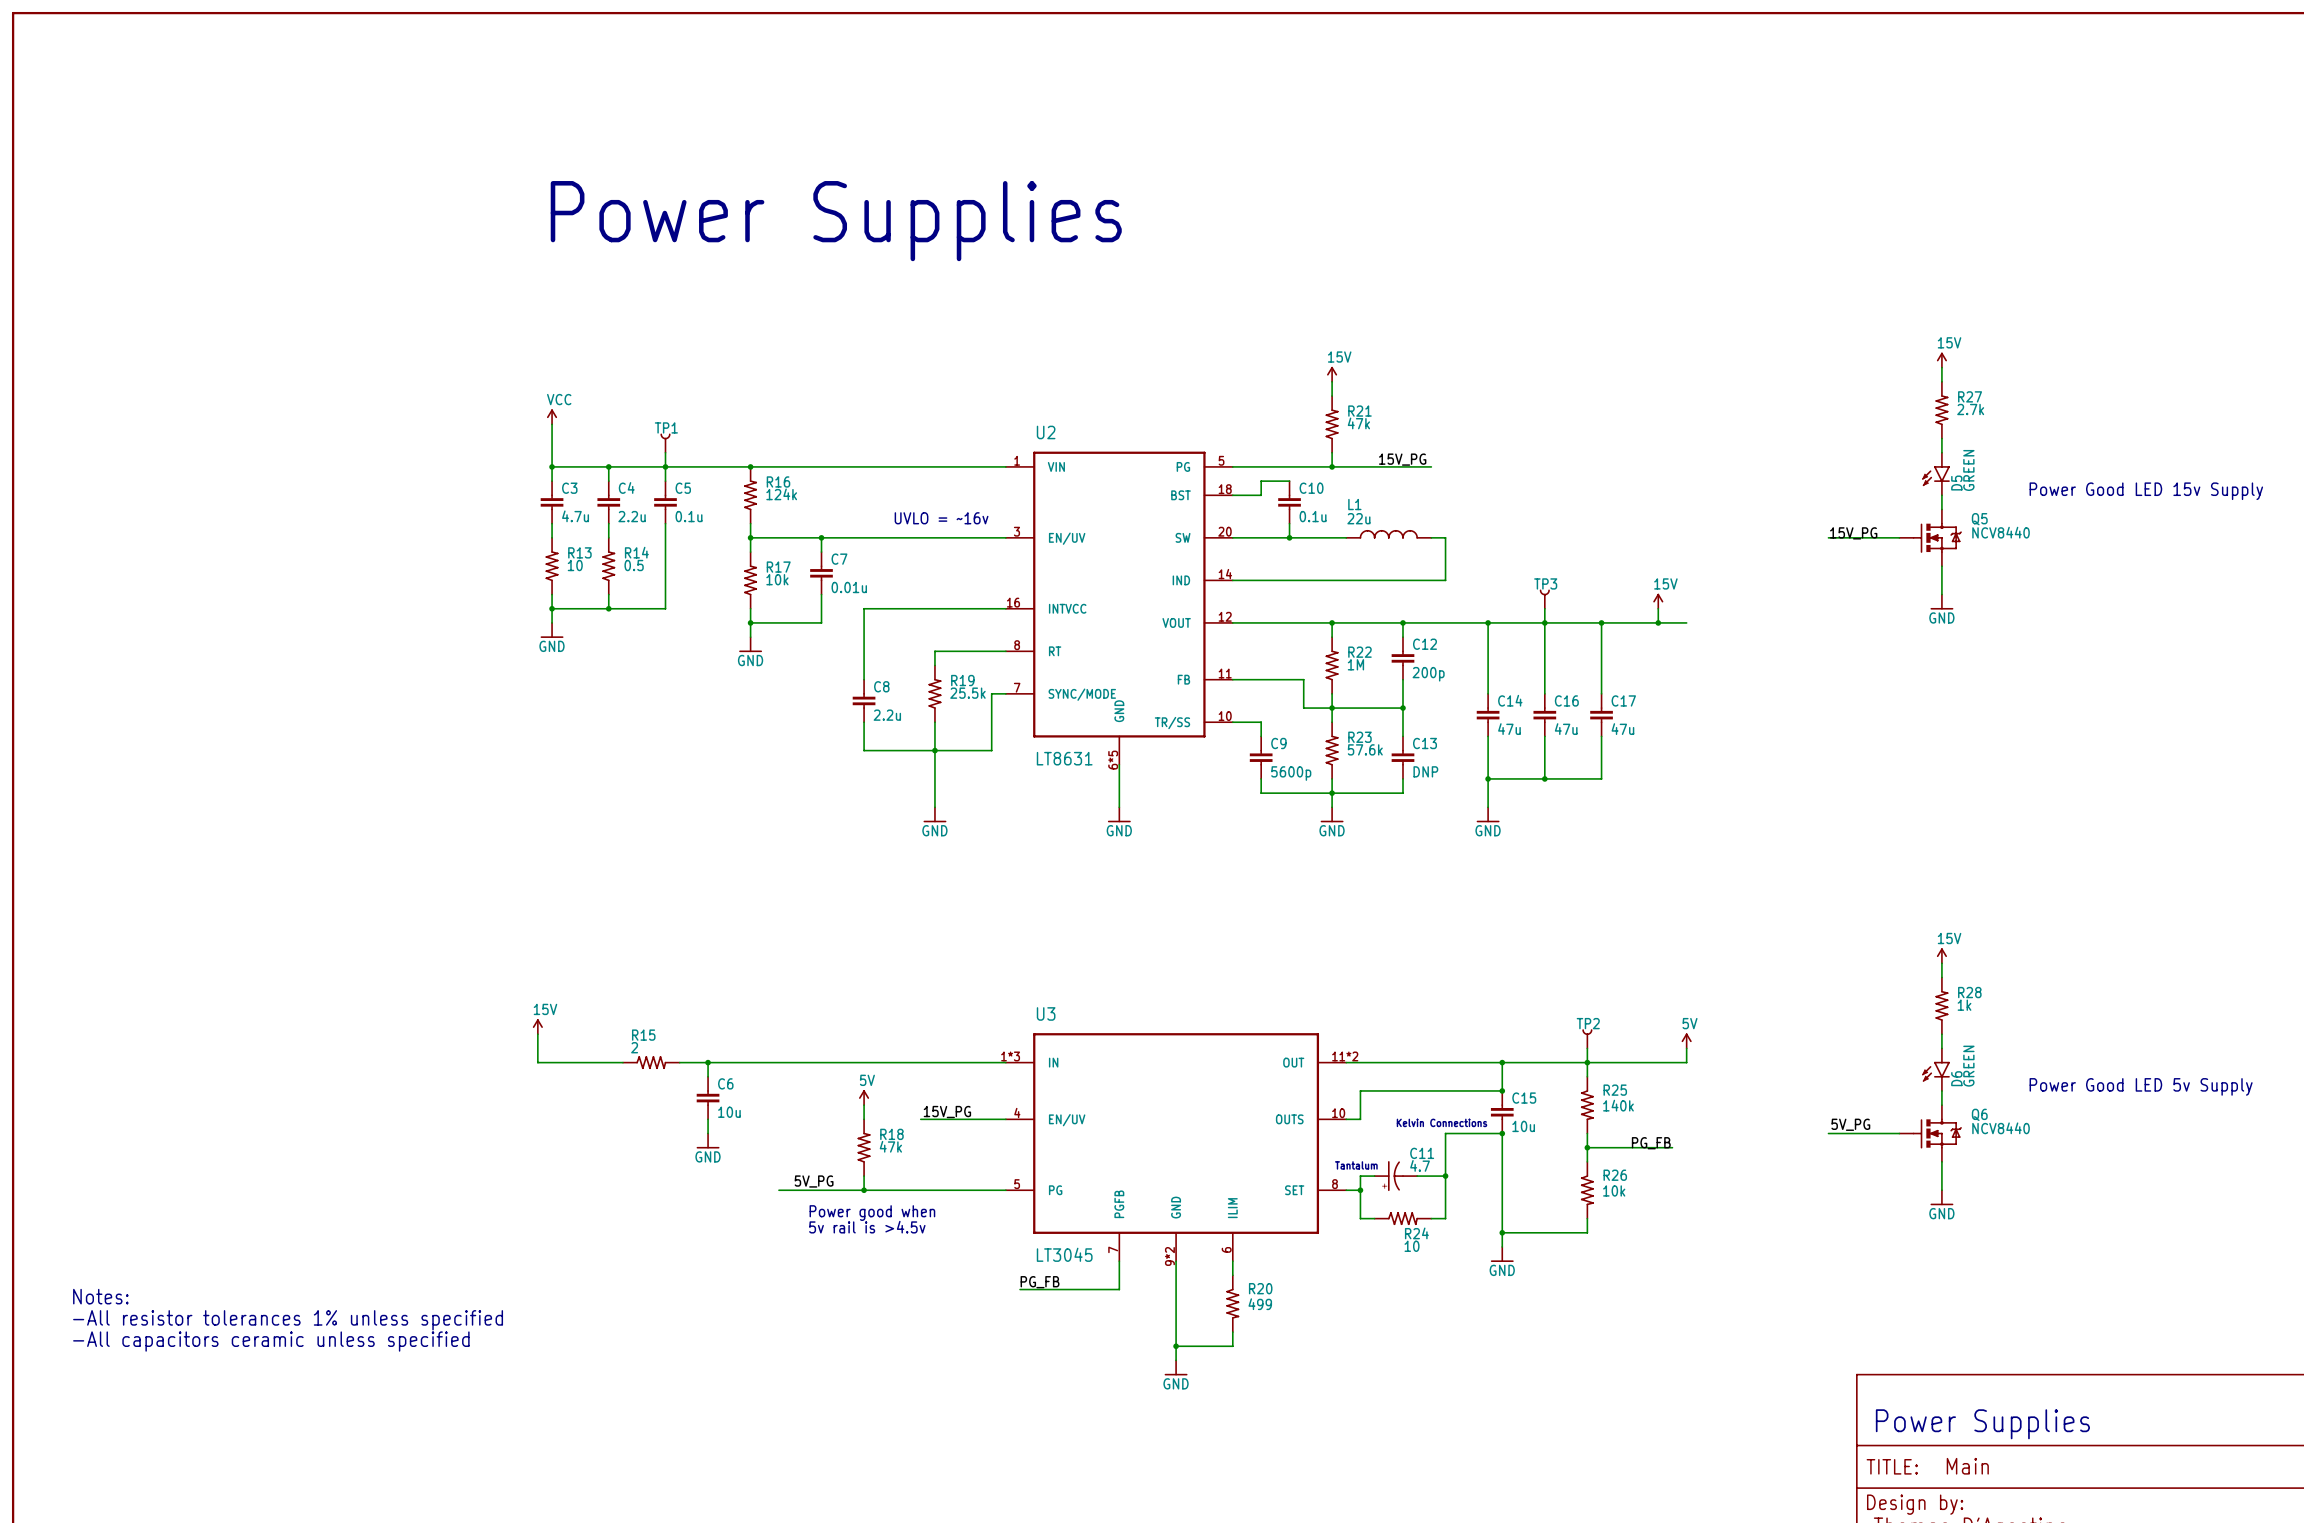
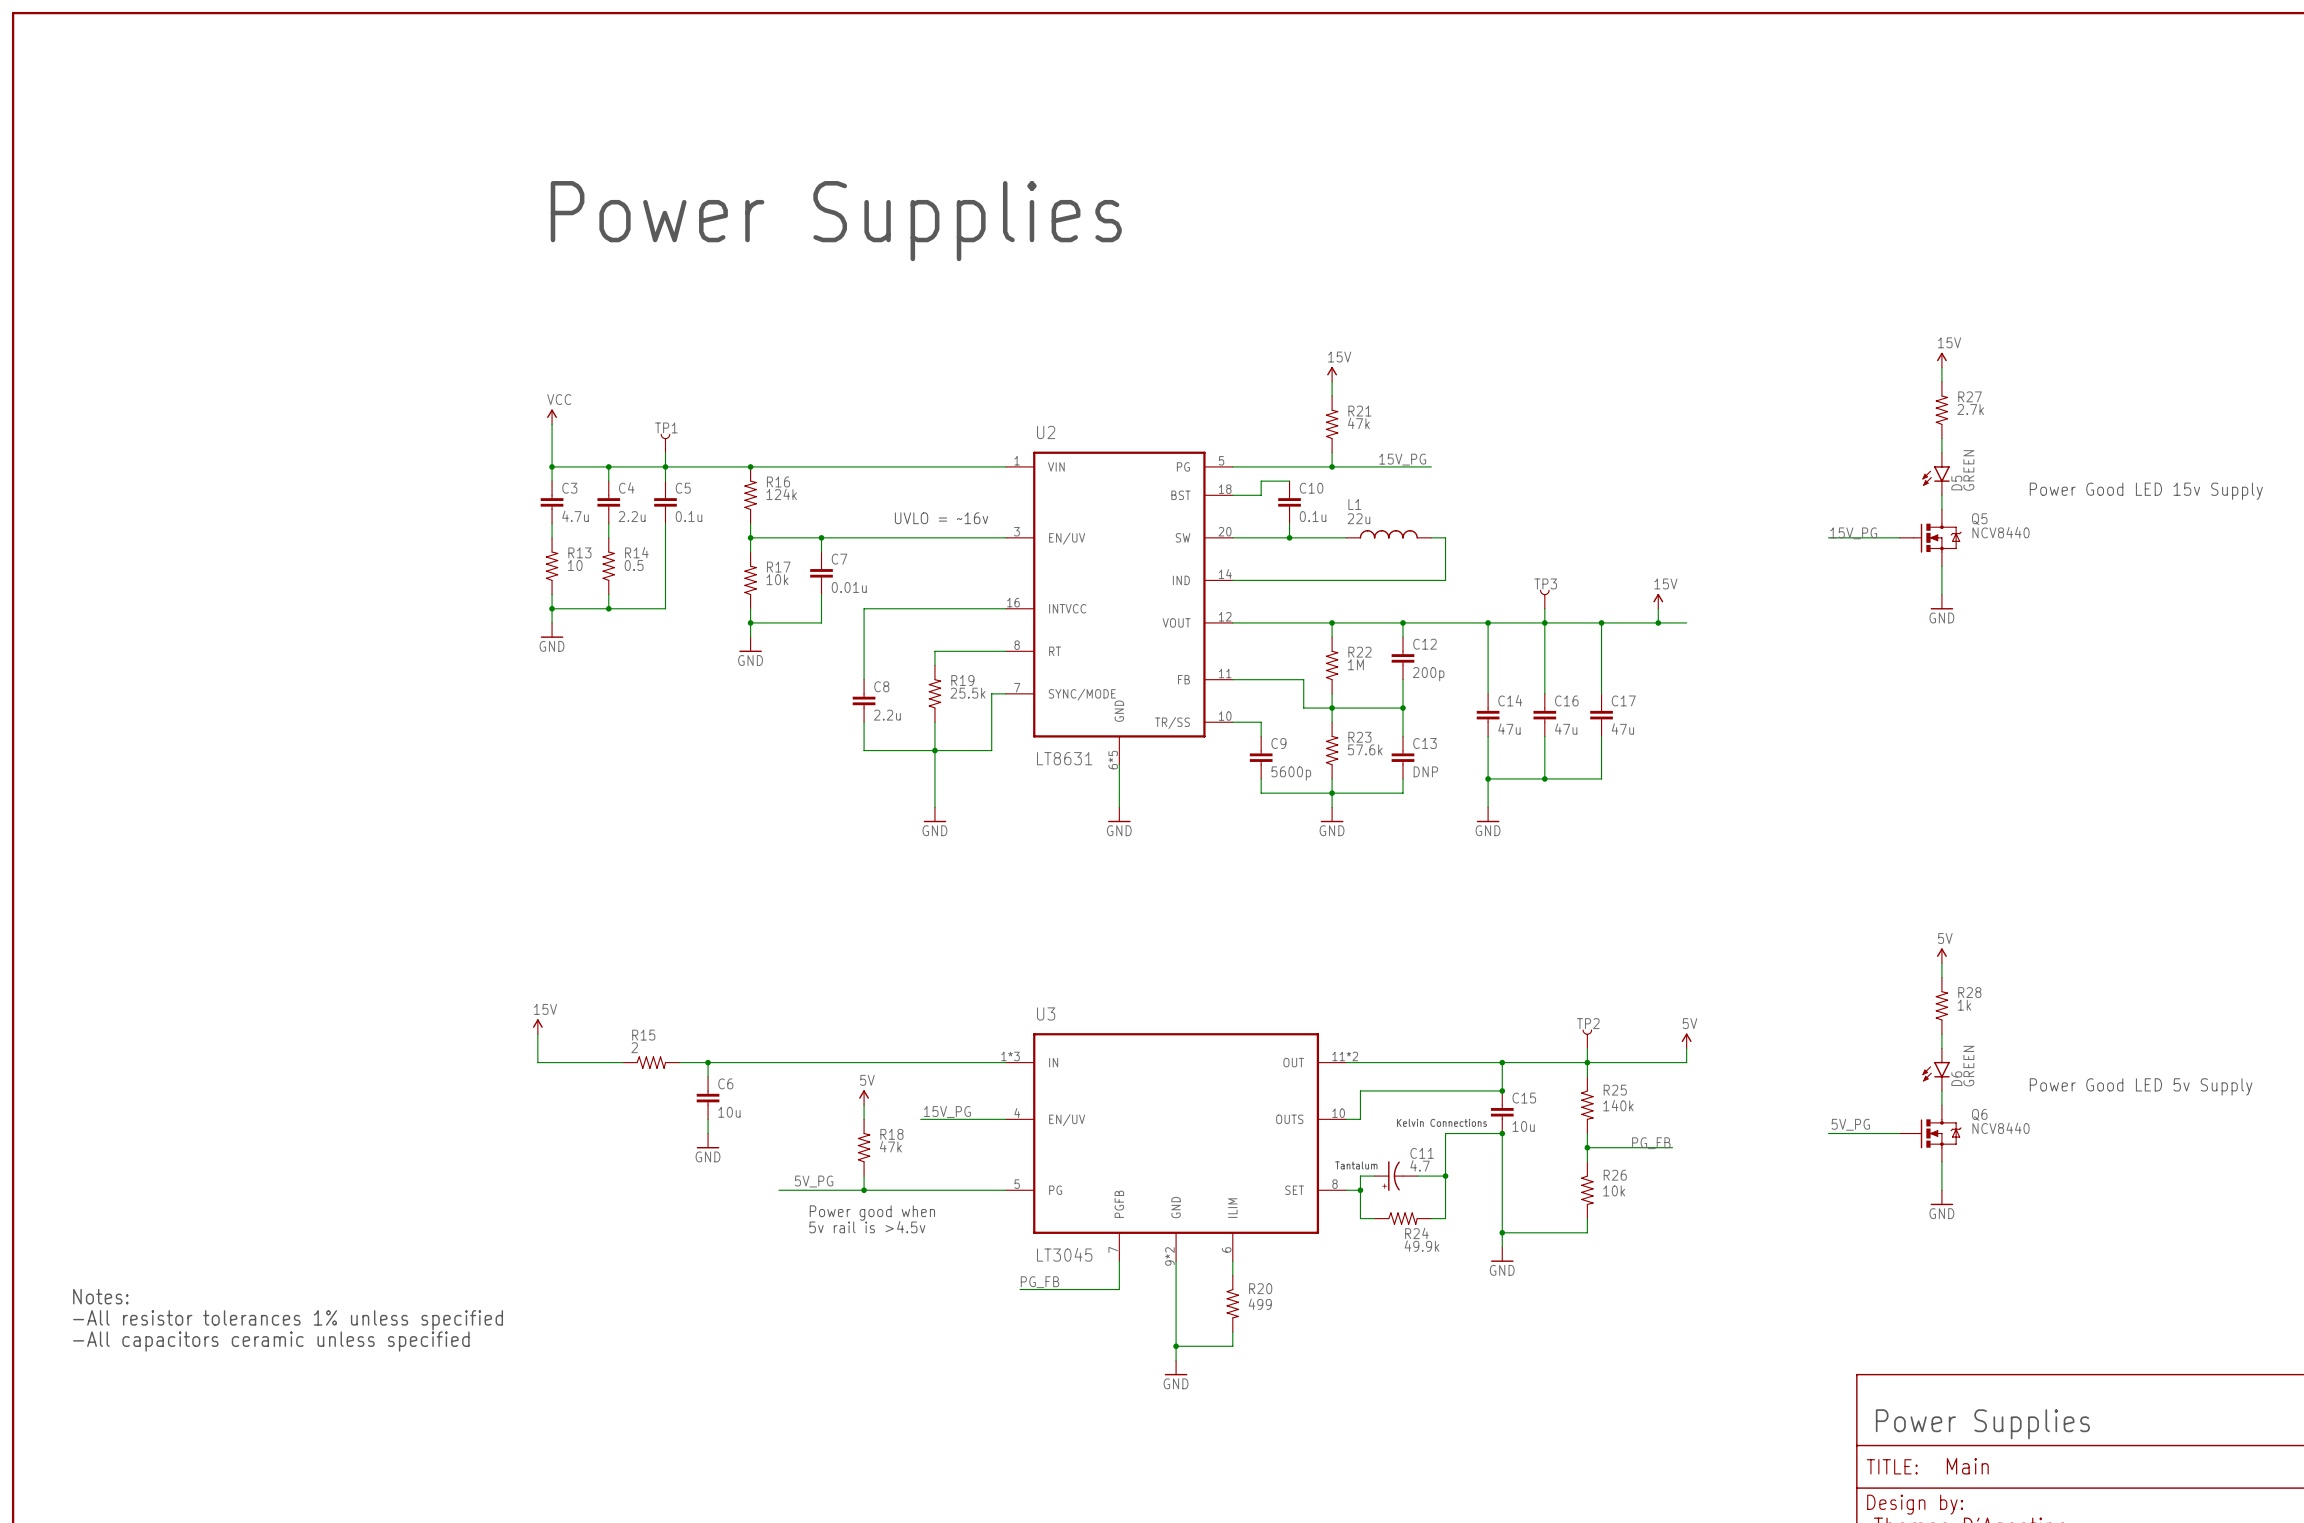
power symbol: 15V (1941, 955) -> 5V (1941, 955)
R24 value: 10 (1412, 1246) -> 49.9k (1422, 1246)

